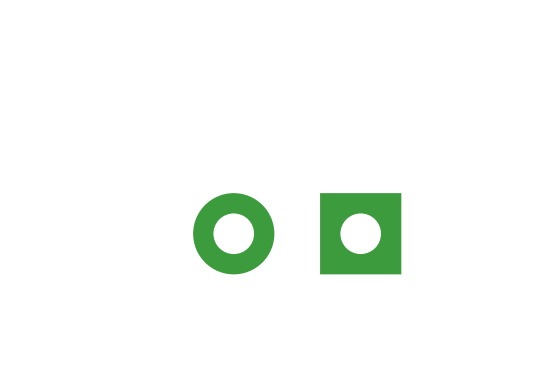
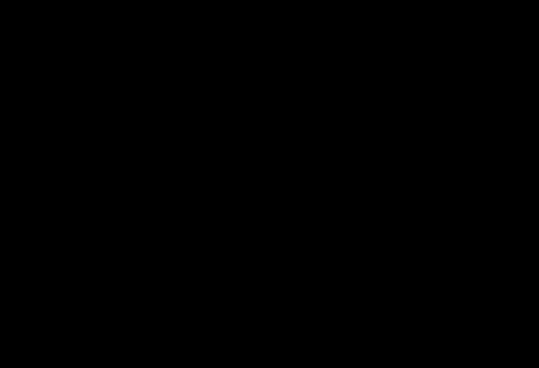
part: (297, 233) -> none

